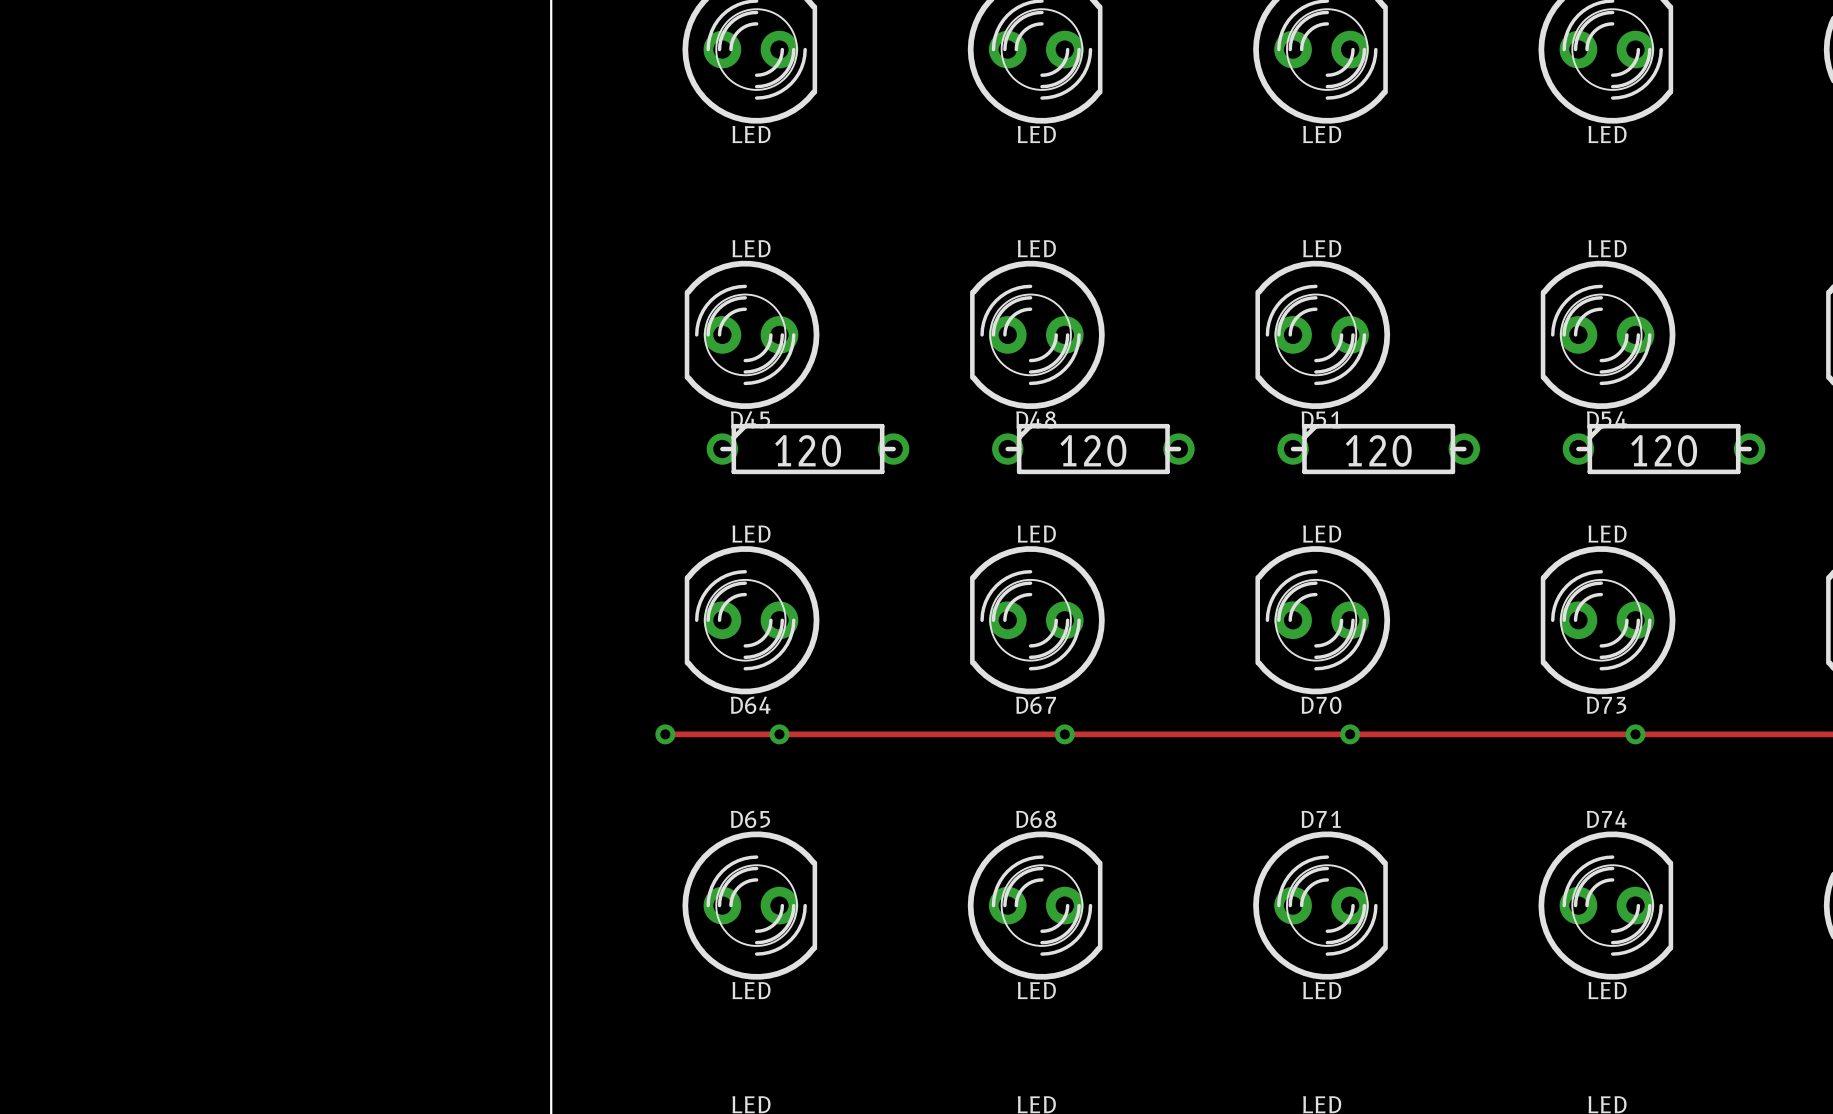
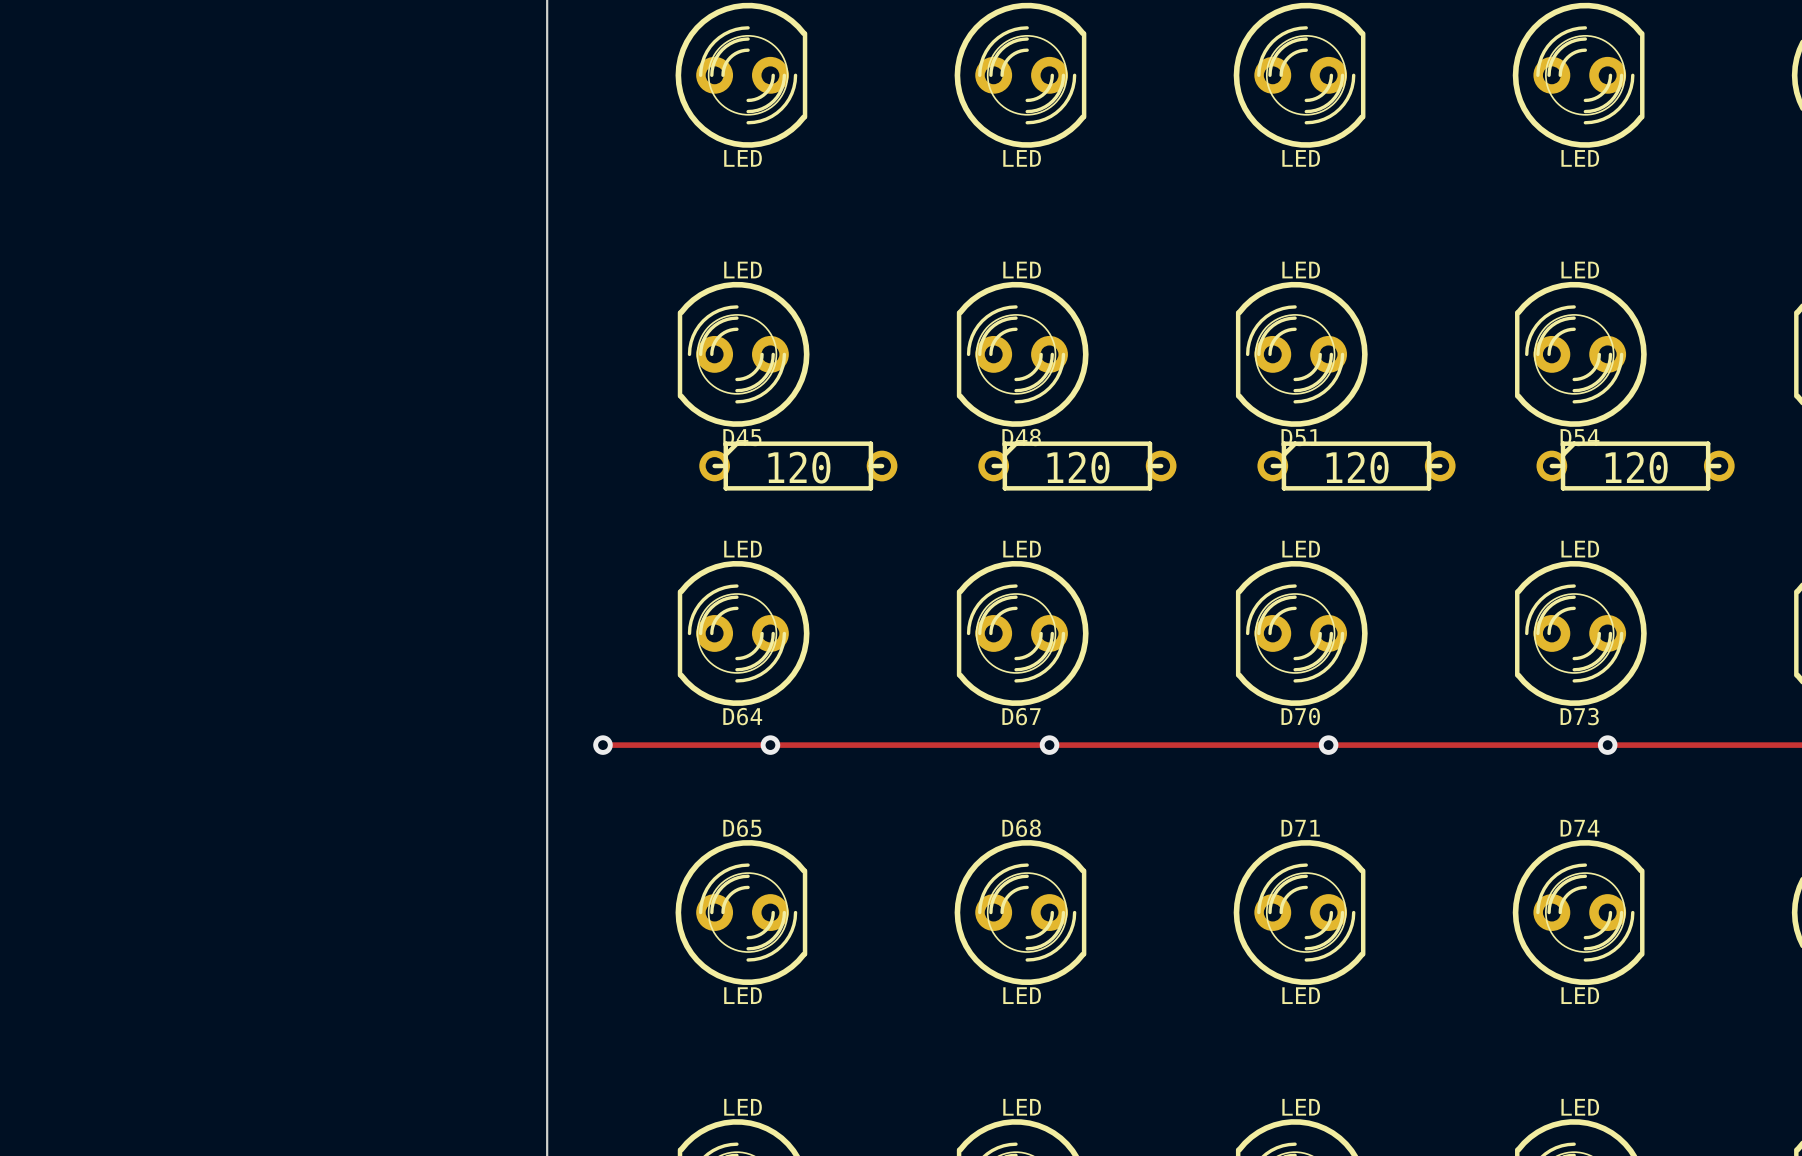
track: none -> (602, 745) (658, 745)
via position: (665, 734) -> (602, 745)

